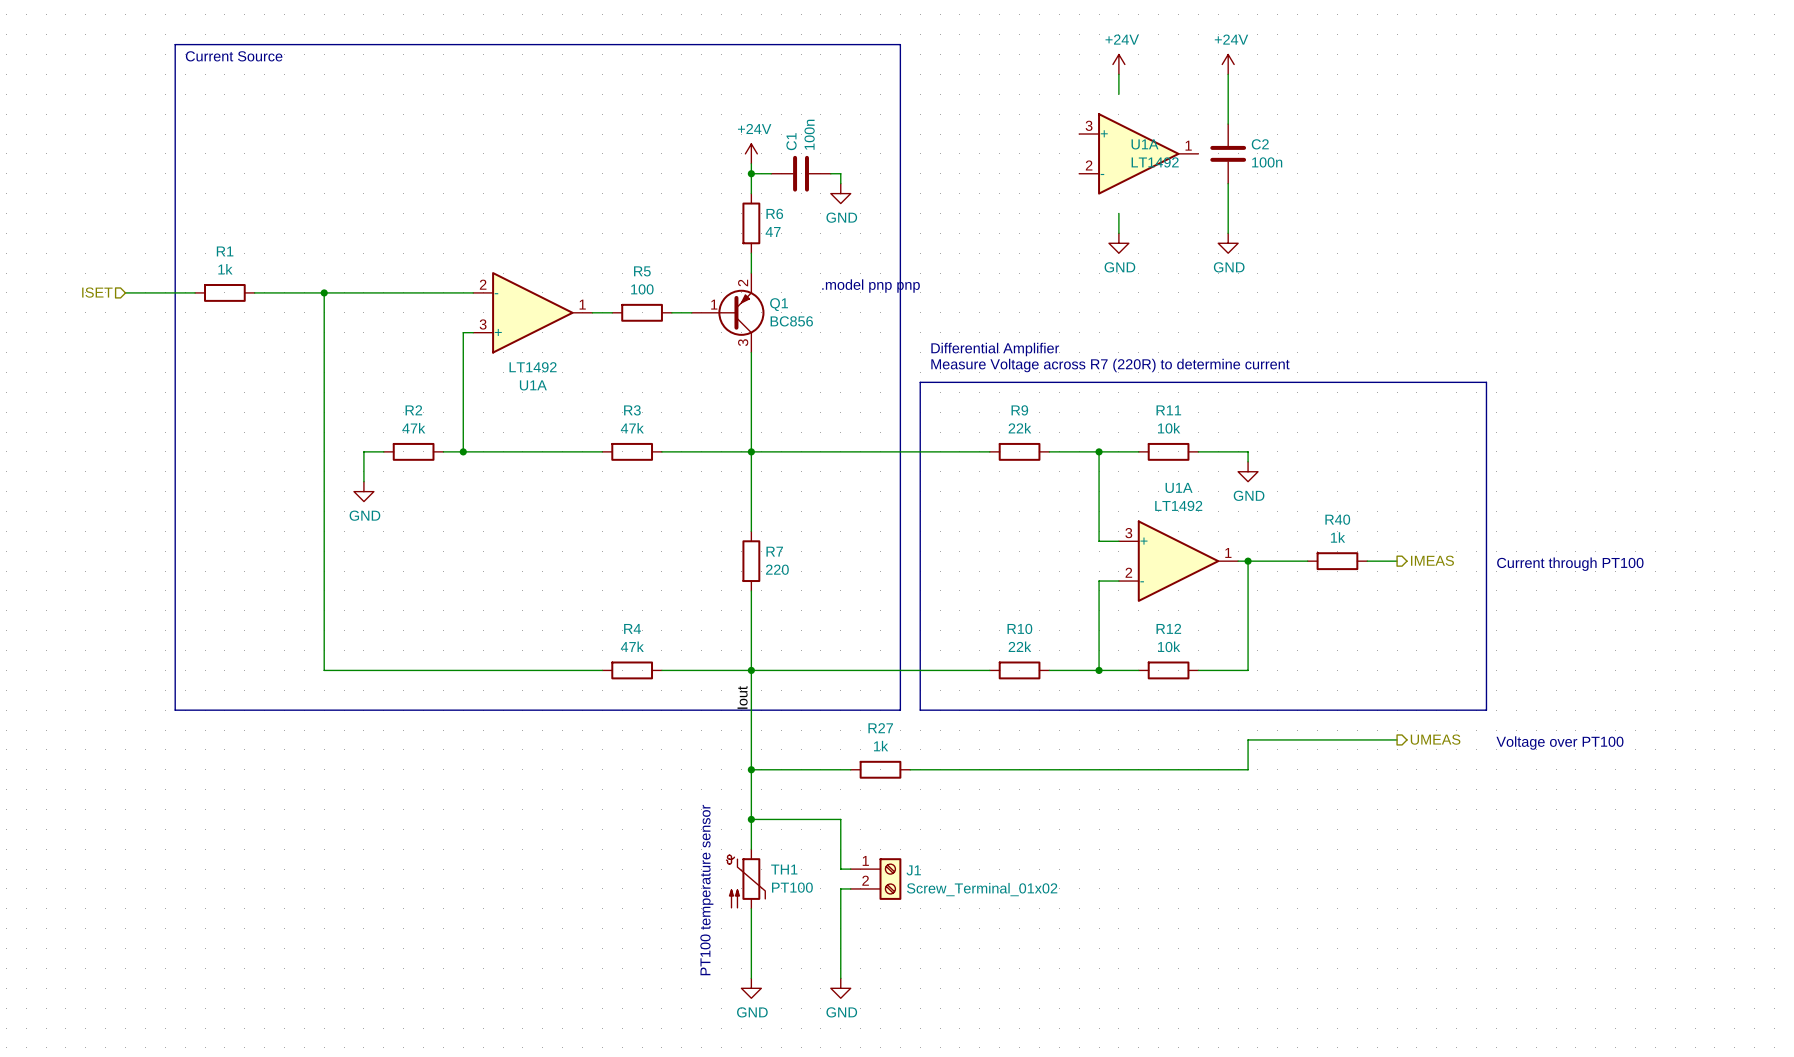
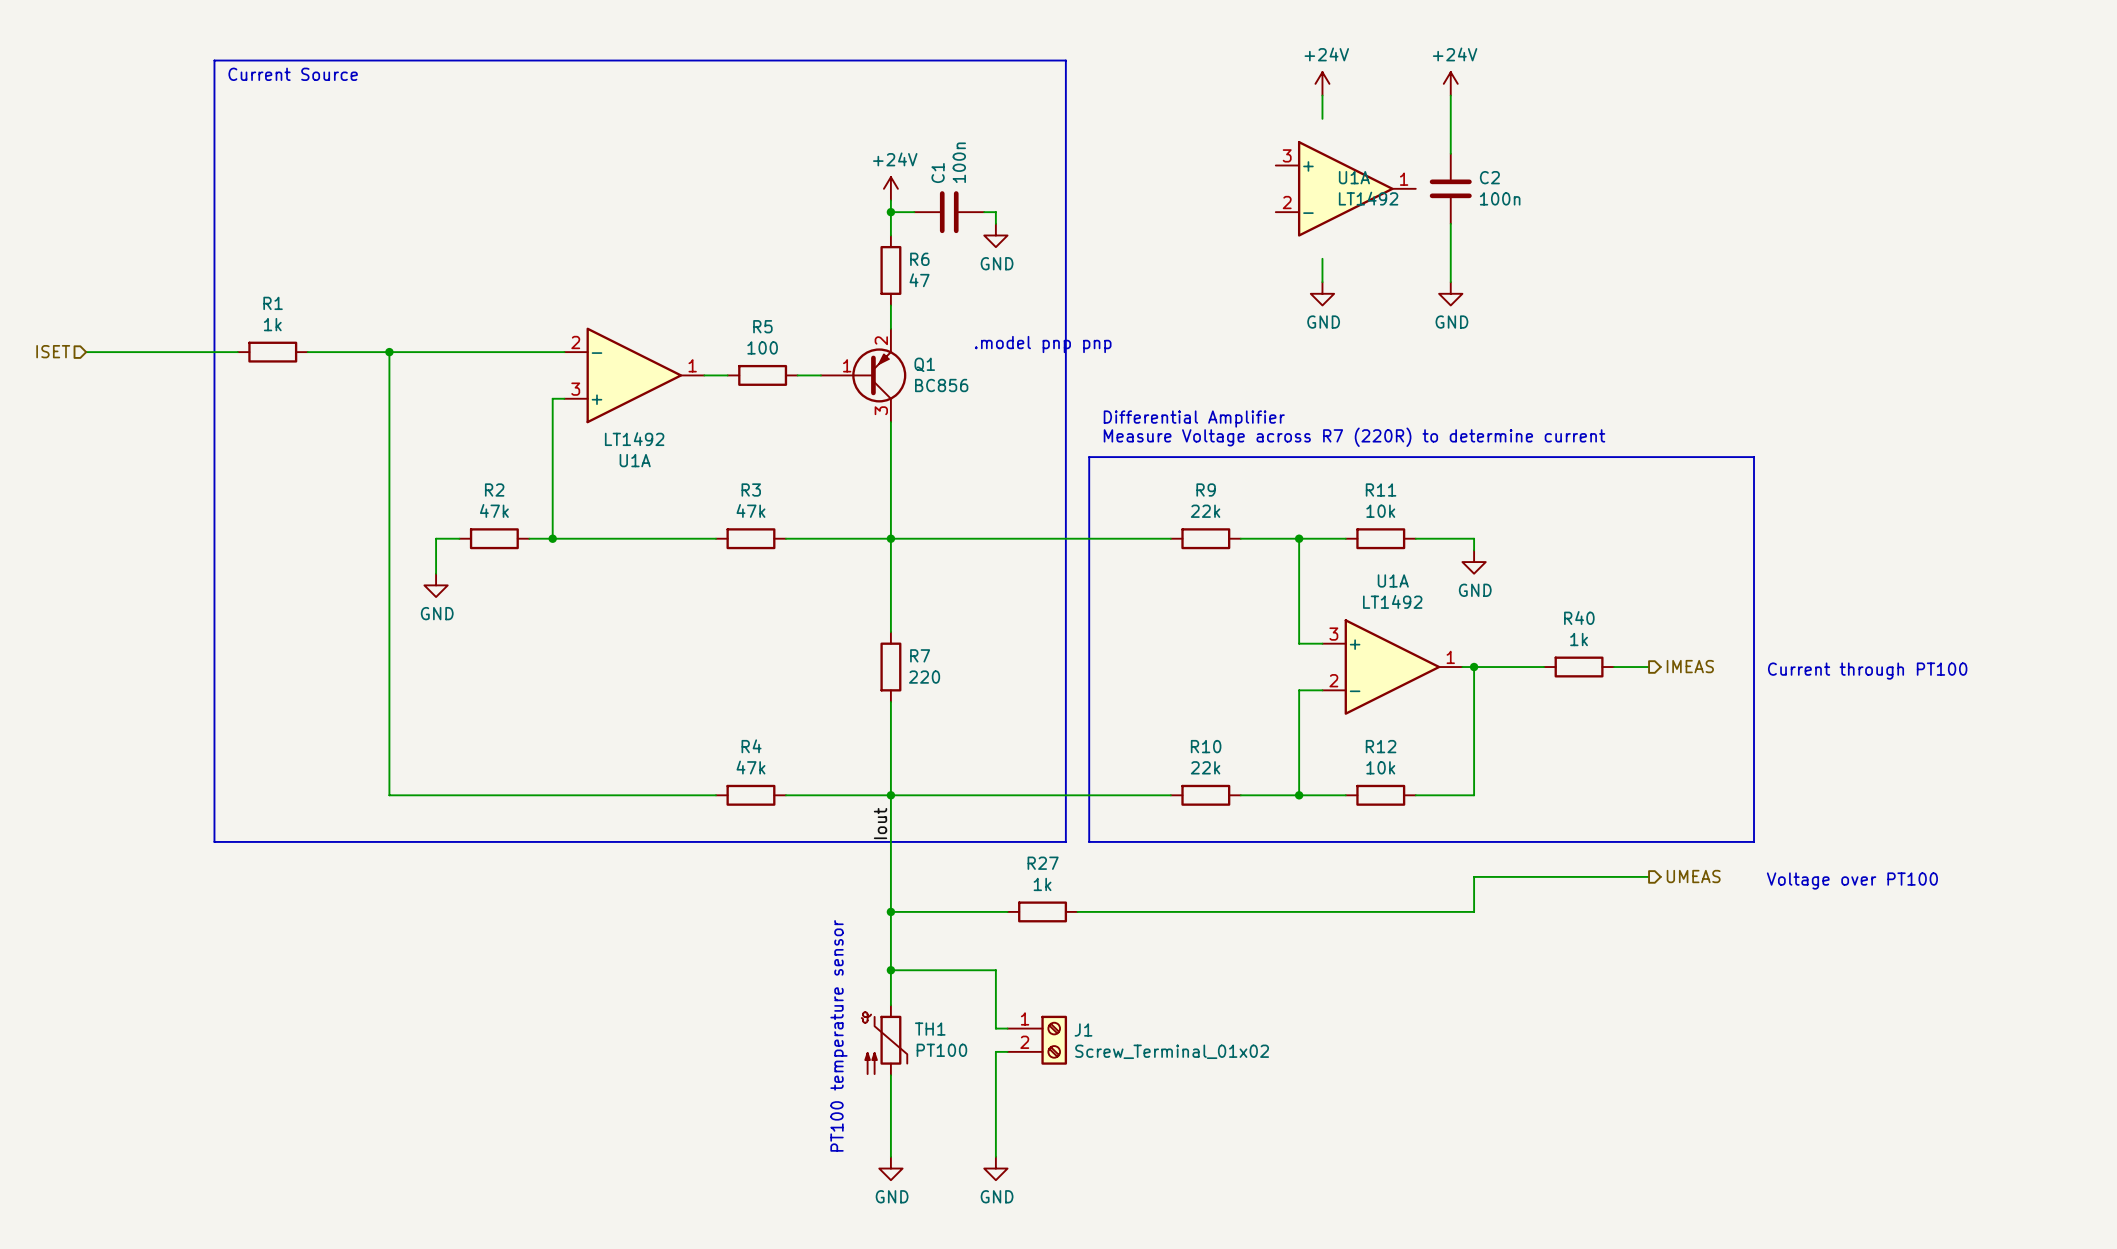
wire: none -> (86, 352) (156, 352)
hierarchical label position: ISET (97, 292) -> ISET (53, 351)

